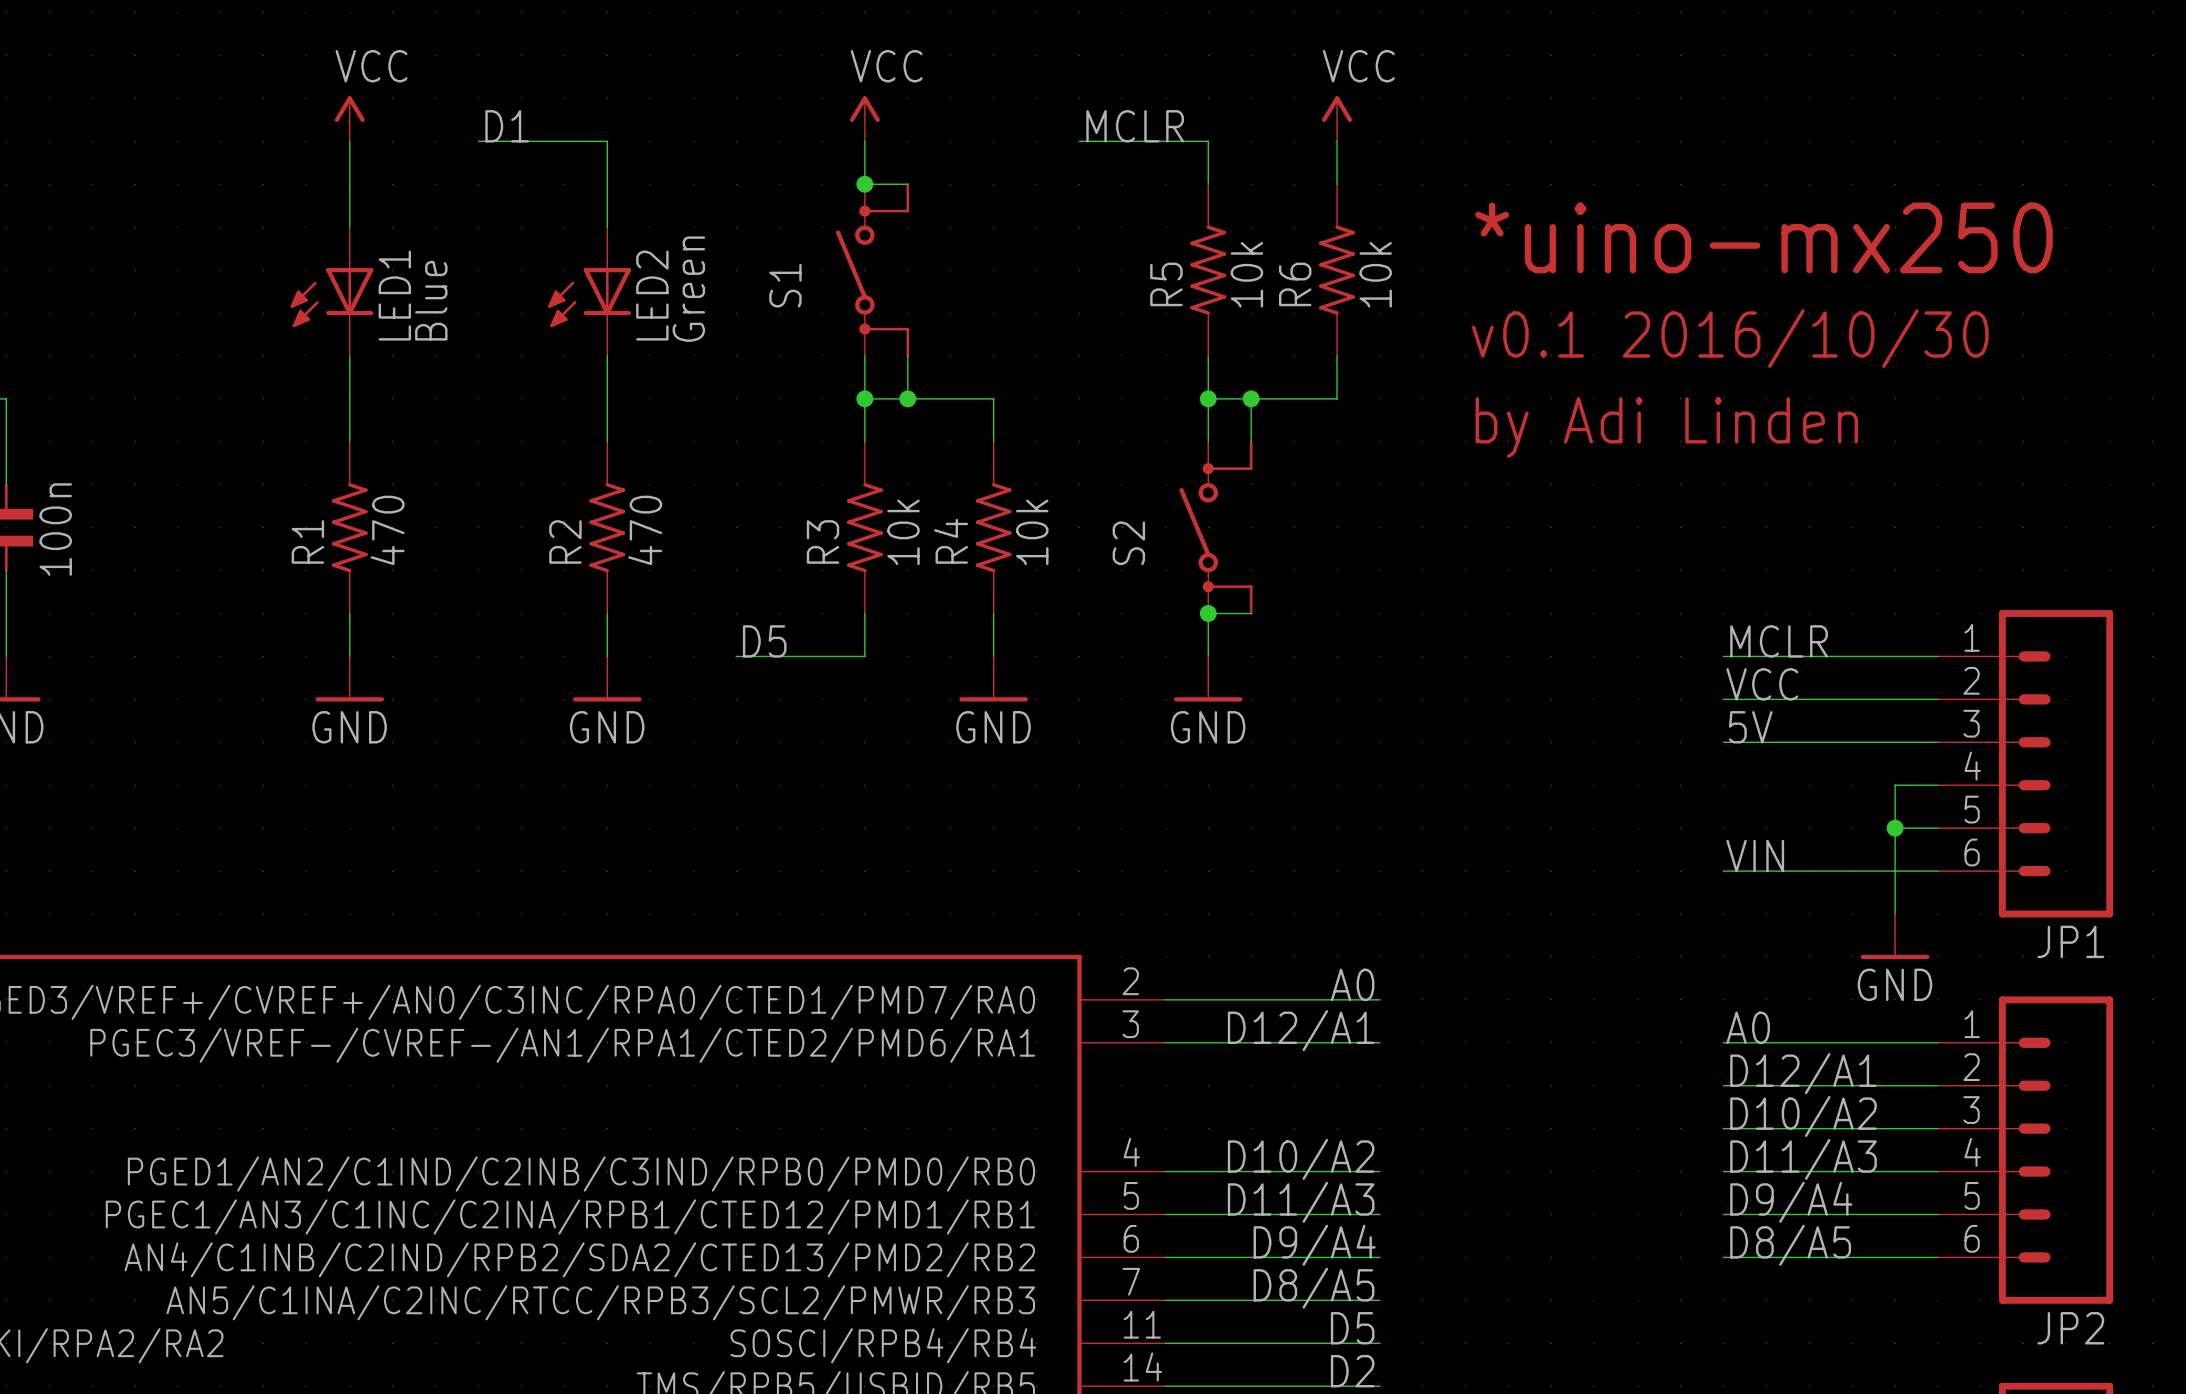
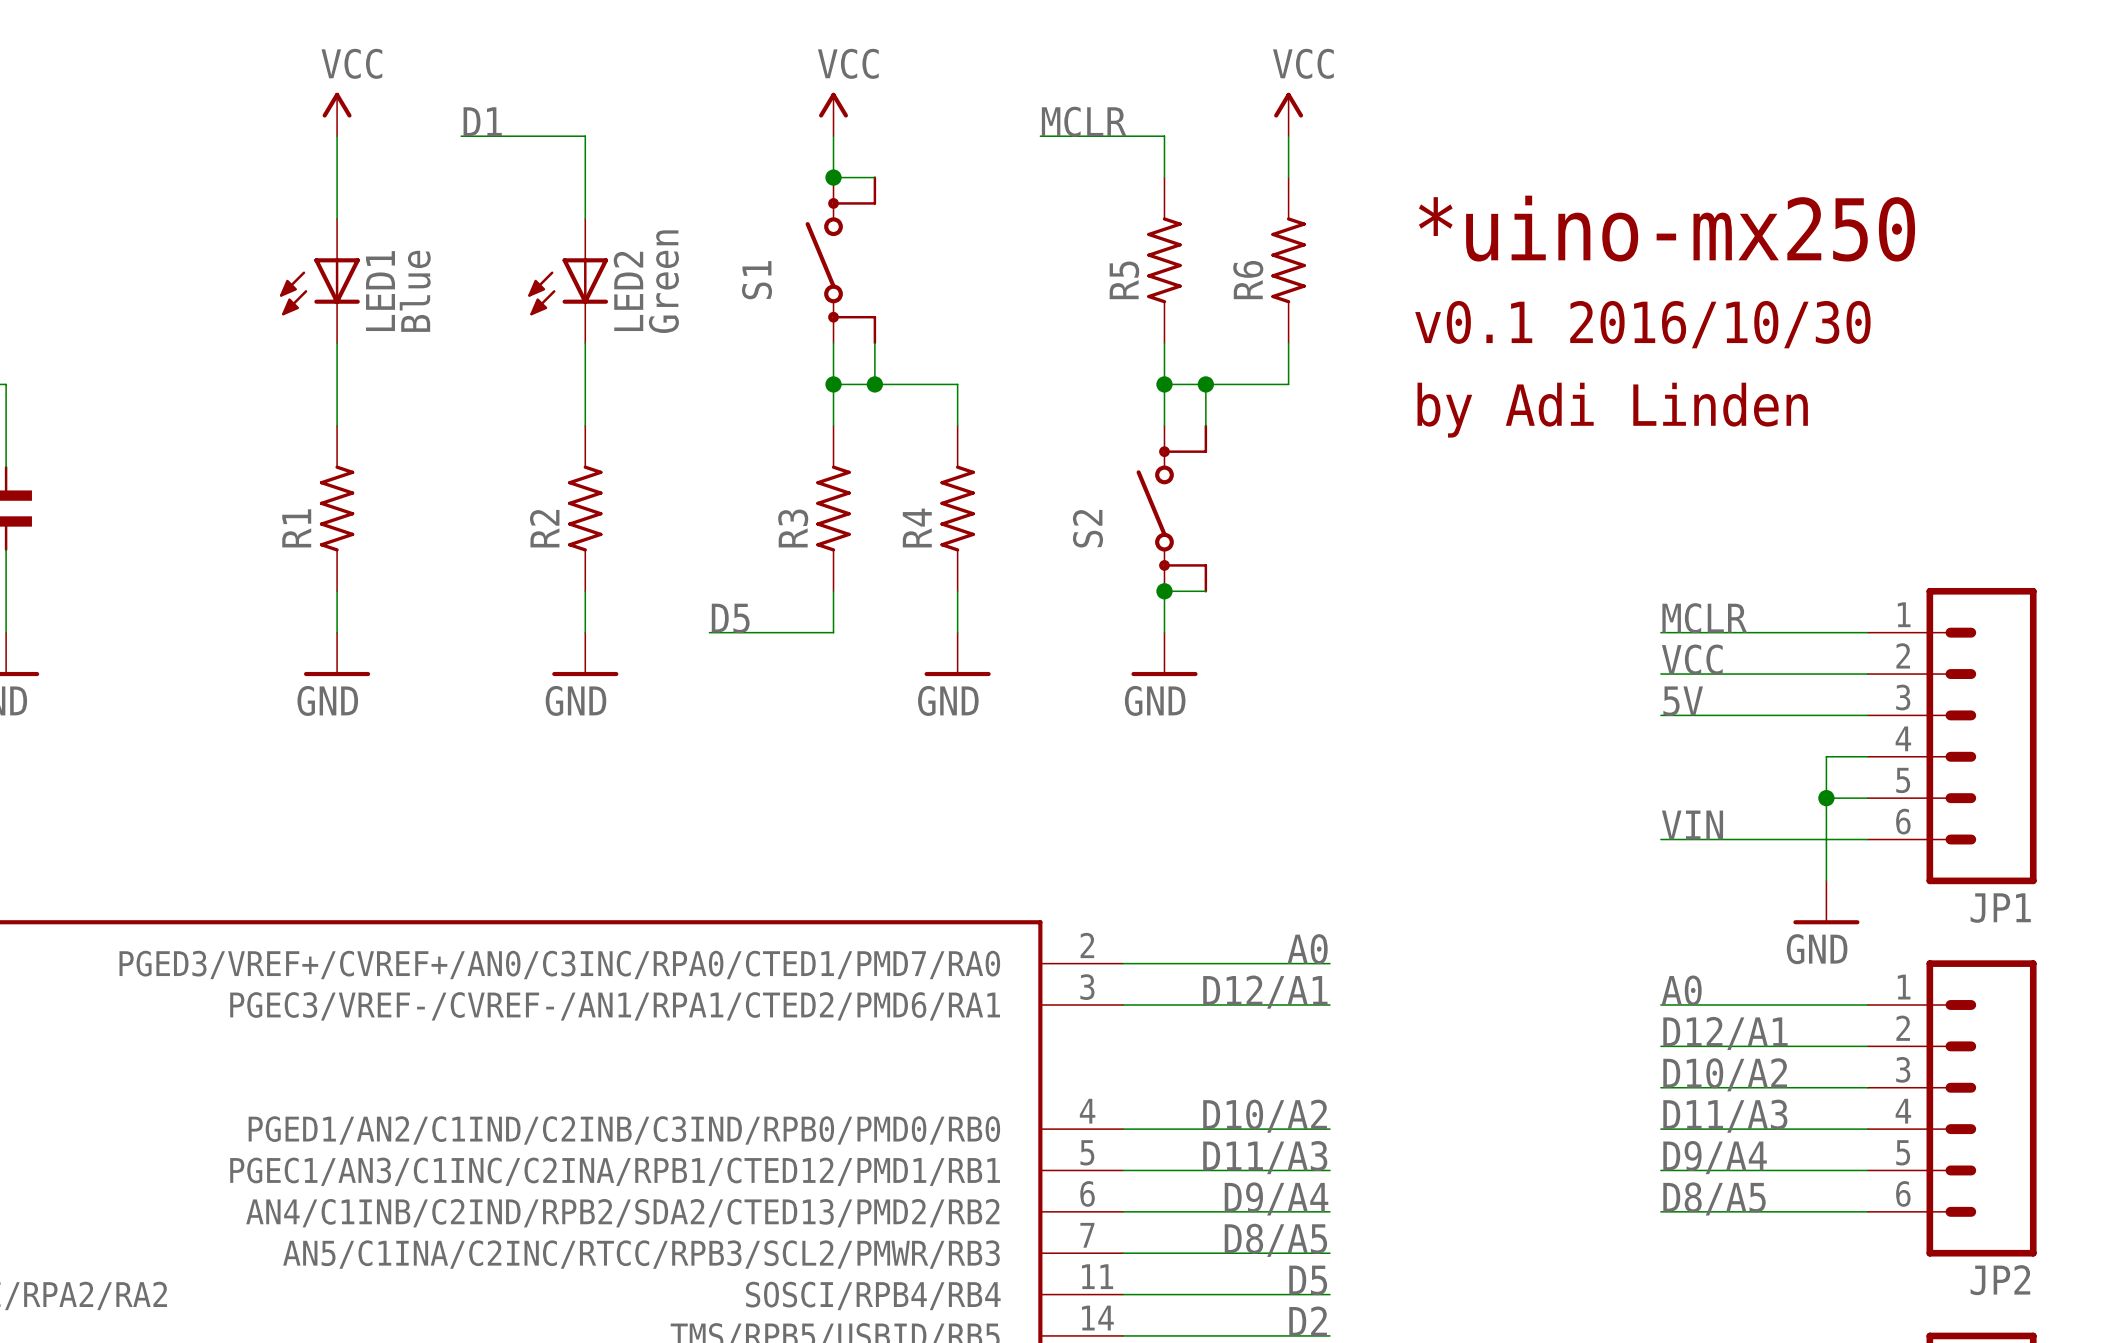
R5 value: 10k (1246, 274) -> none
R6 value: 10k (1375, 274) -> none
part value: 100n (55, 529) -> none
R1 value: 470 (387, 530) -> none
R2 value: 470 (645, 530) -> none
R3 value: 10k (903, 532) -> none
R4 value: 10k (1032, 532) -> none

